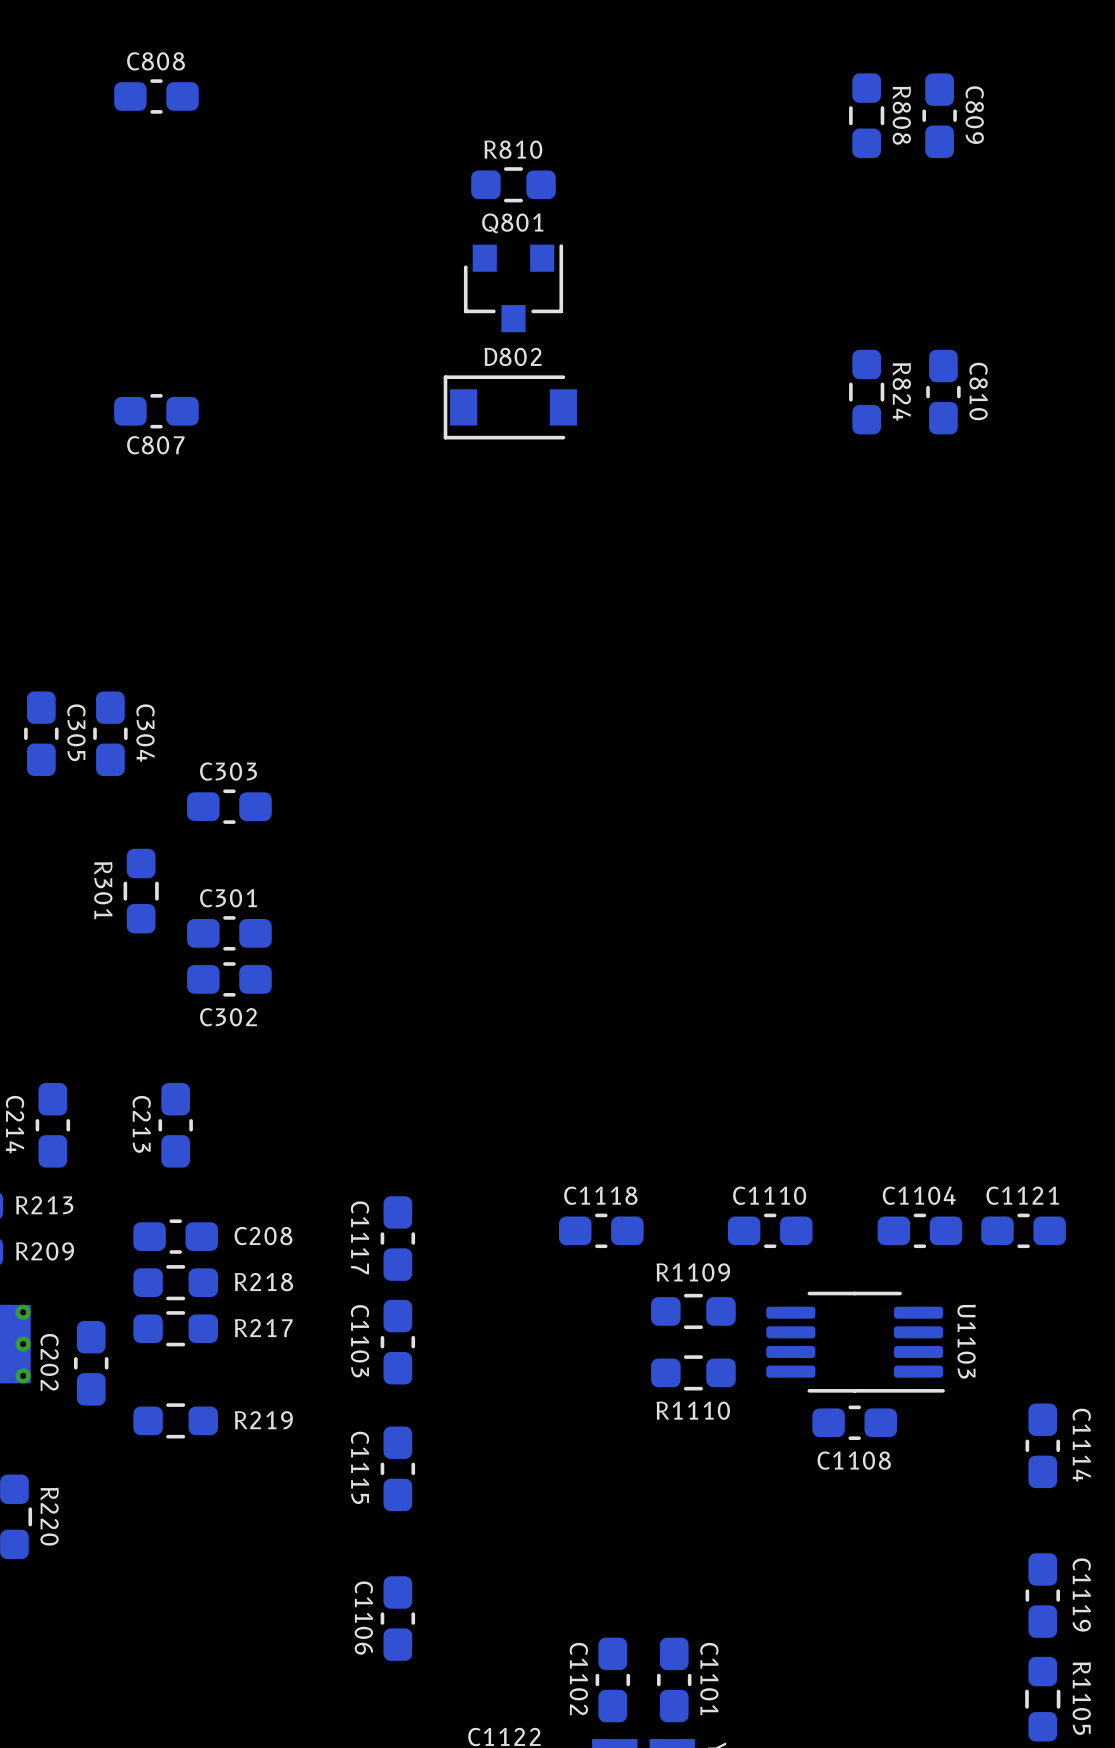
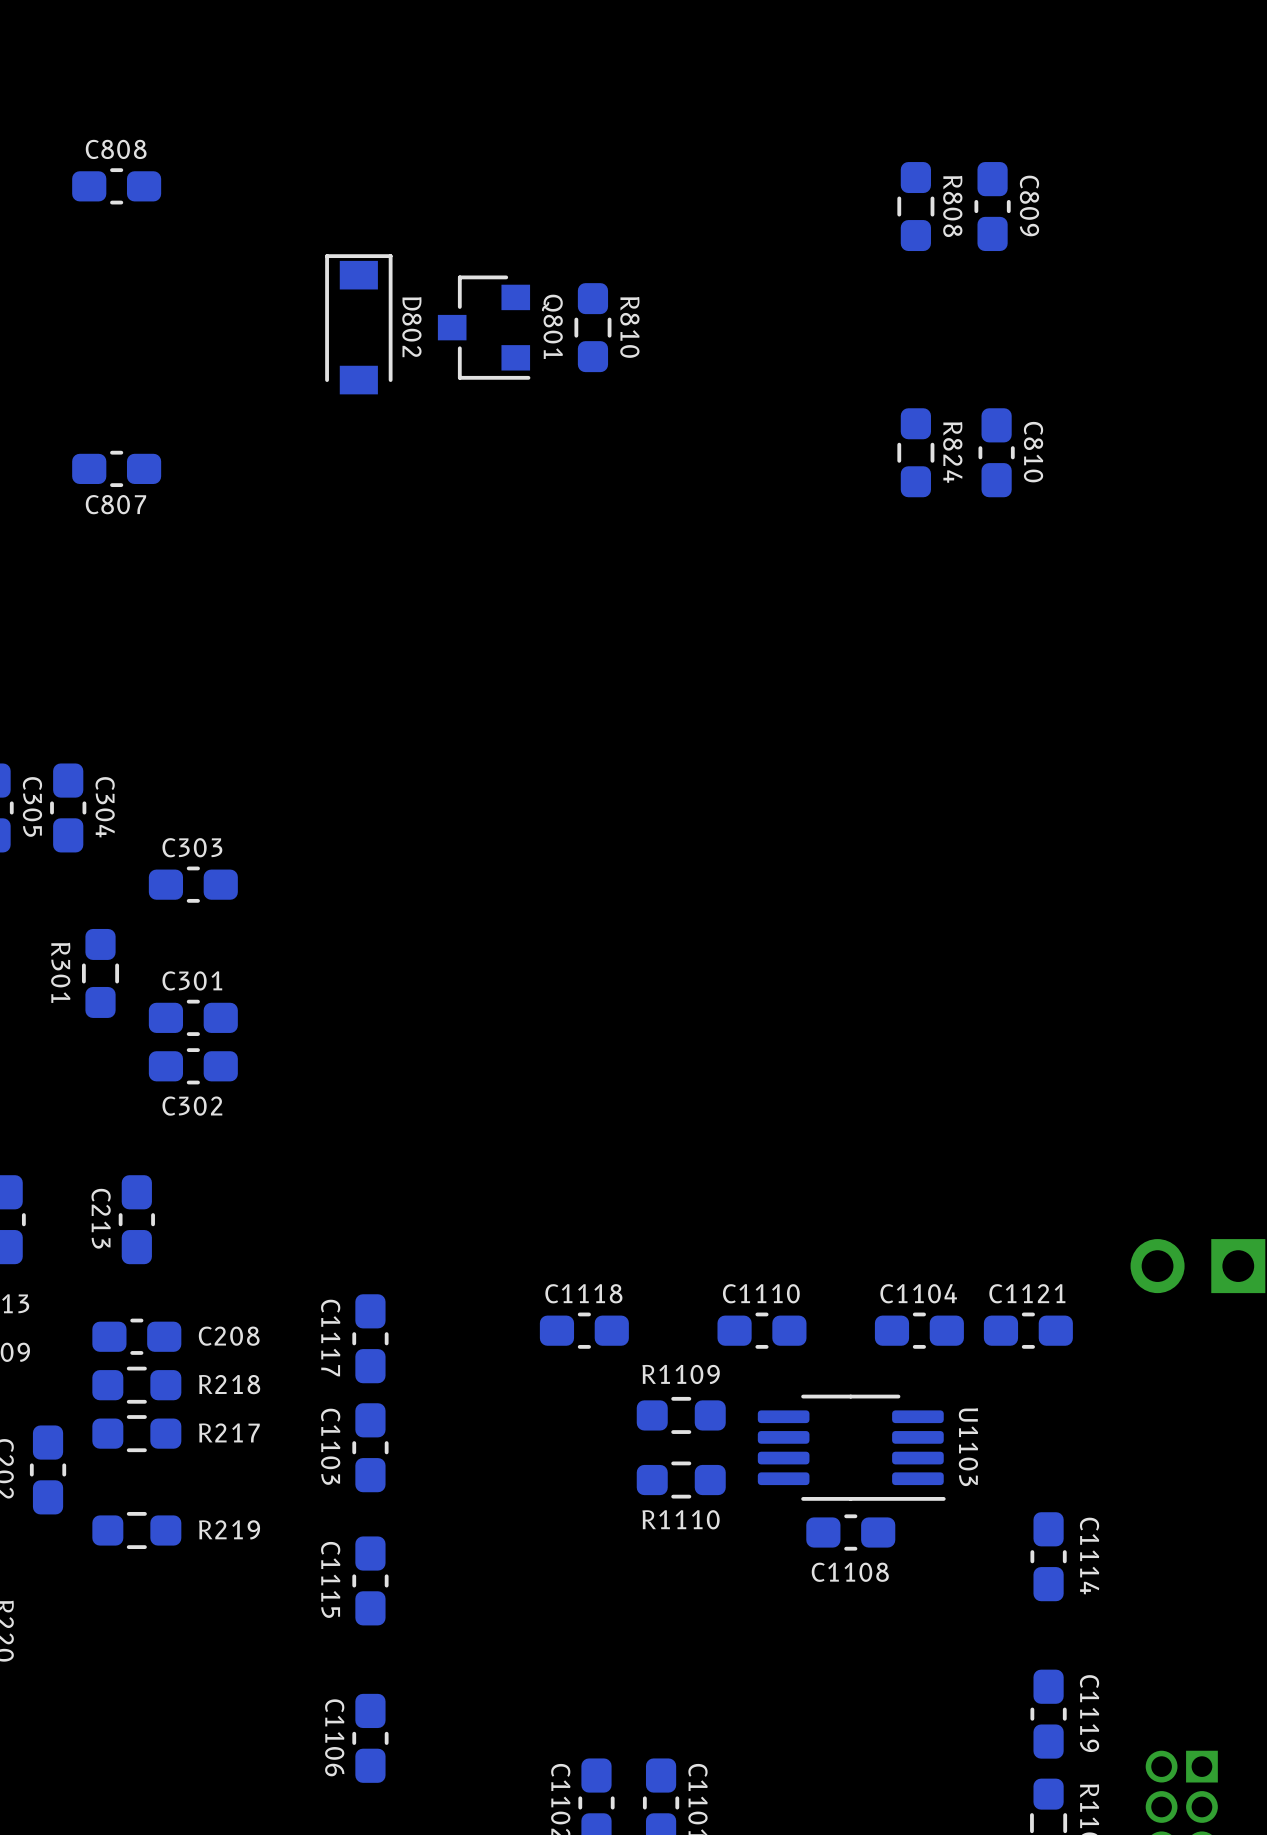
C808 position: (156, 96) -> (116, 186)
R808 position: (866, 115) -> (915, 206)
C809 position: (939, 115) -> (992, 206)
R810 rotation: 0° (513, 184) -> 90° clockwise (592, 327)
R810 position: (513, 184) -> (592, 327)
Q801 rotation: 0° (513, 288) -> 90° clockwise (484, 327)
R824 position: (866, 392) -> (915, 452)
C810 position: (943, 392) -> (996, 452)
D802 rotation: 0° (510, 407) -> 90° clockwise (358, 324)
D802 position: (510, 407) -> (358, 324)

